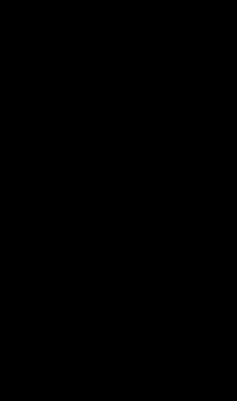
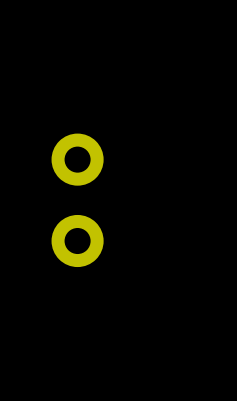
part: none -> (77, 200)

